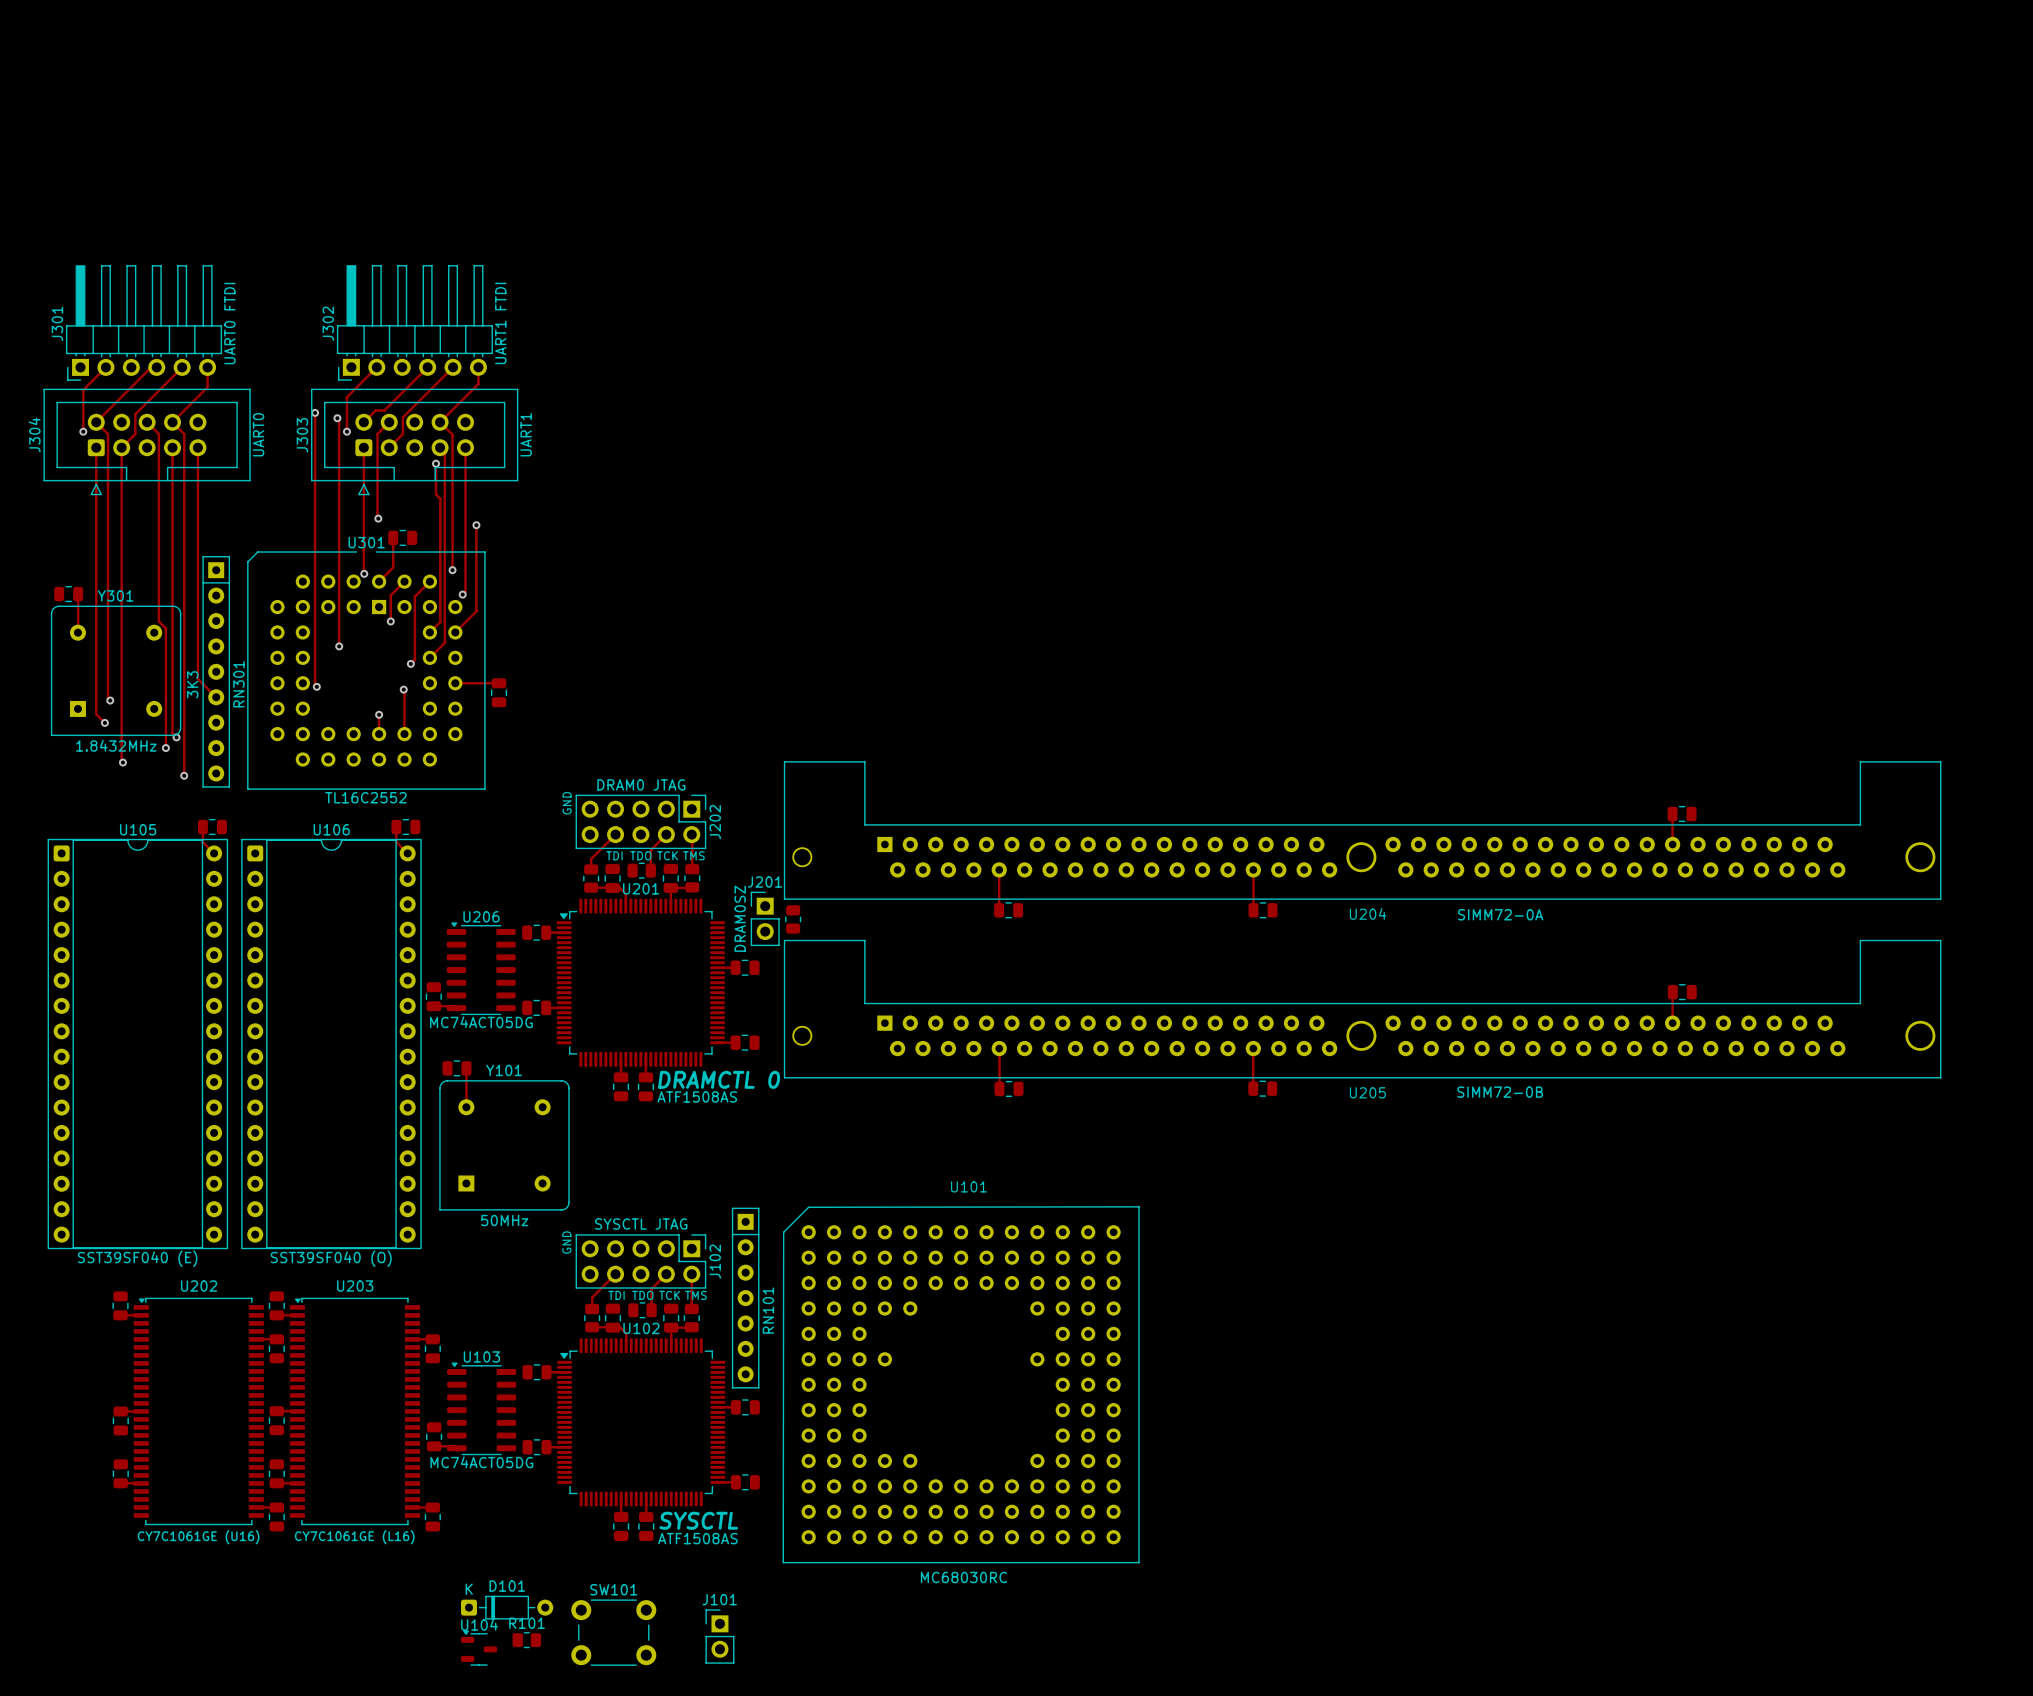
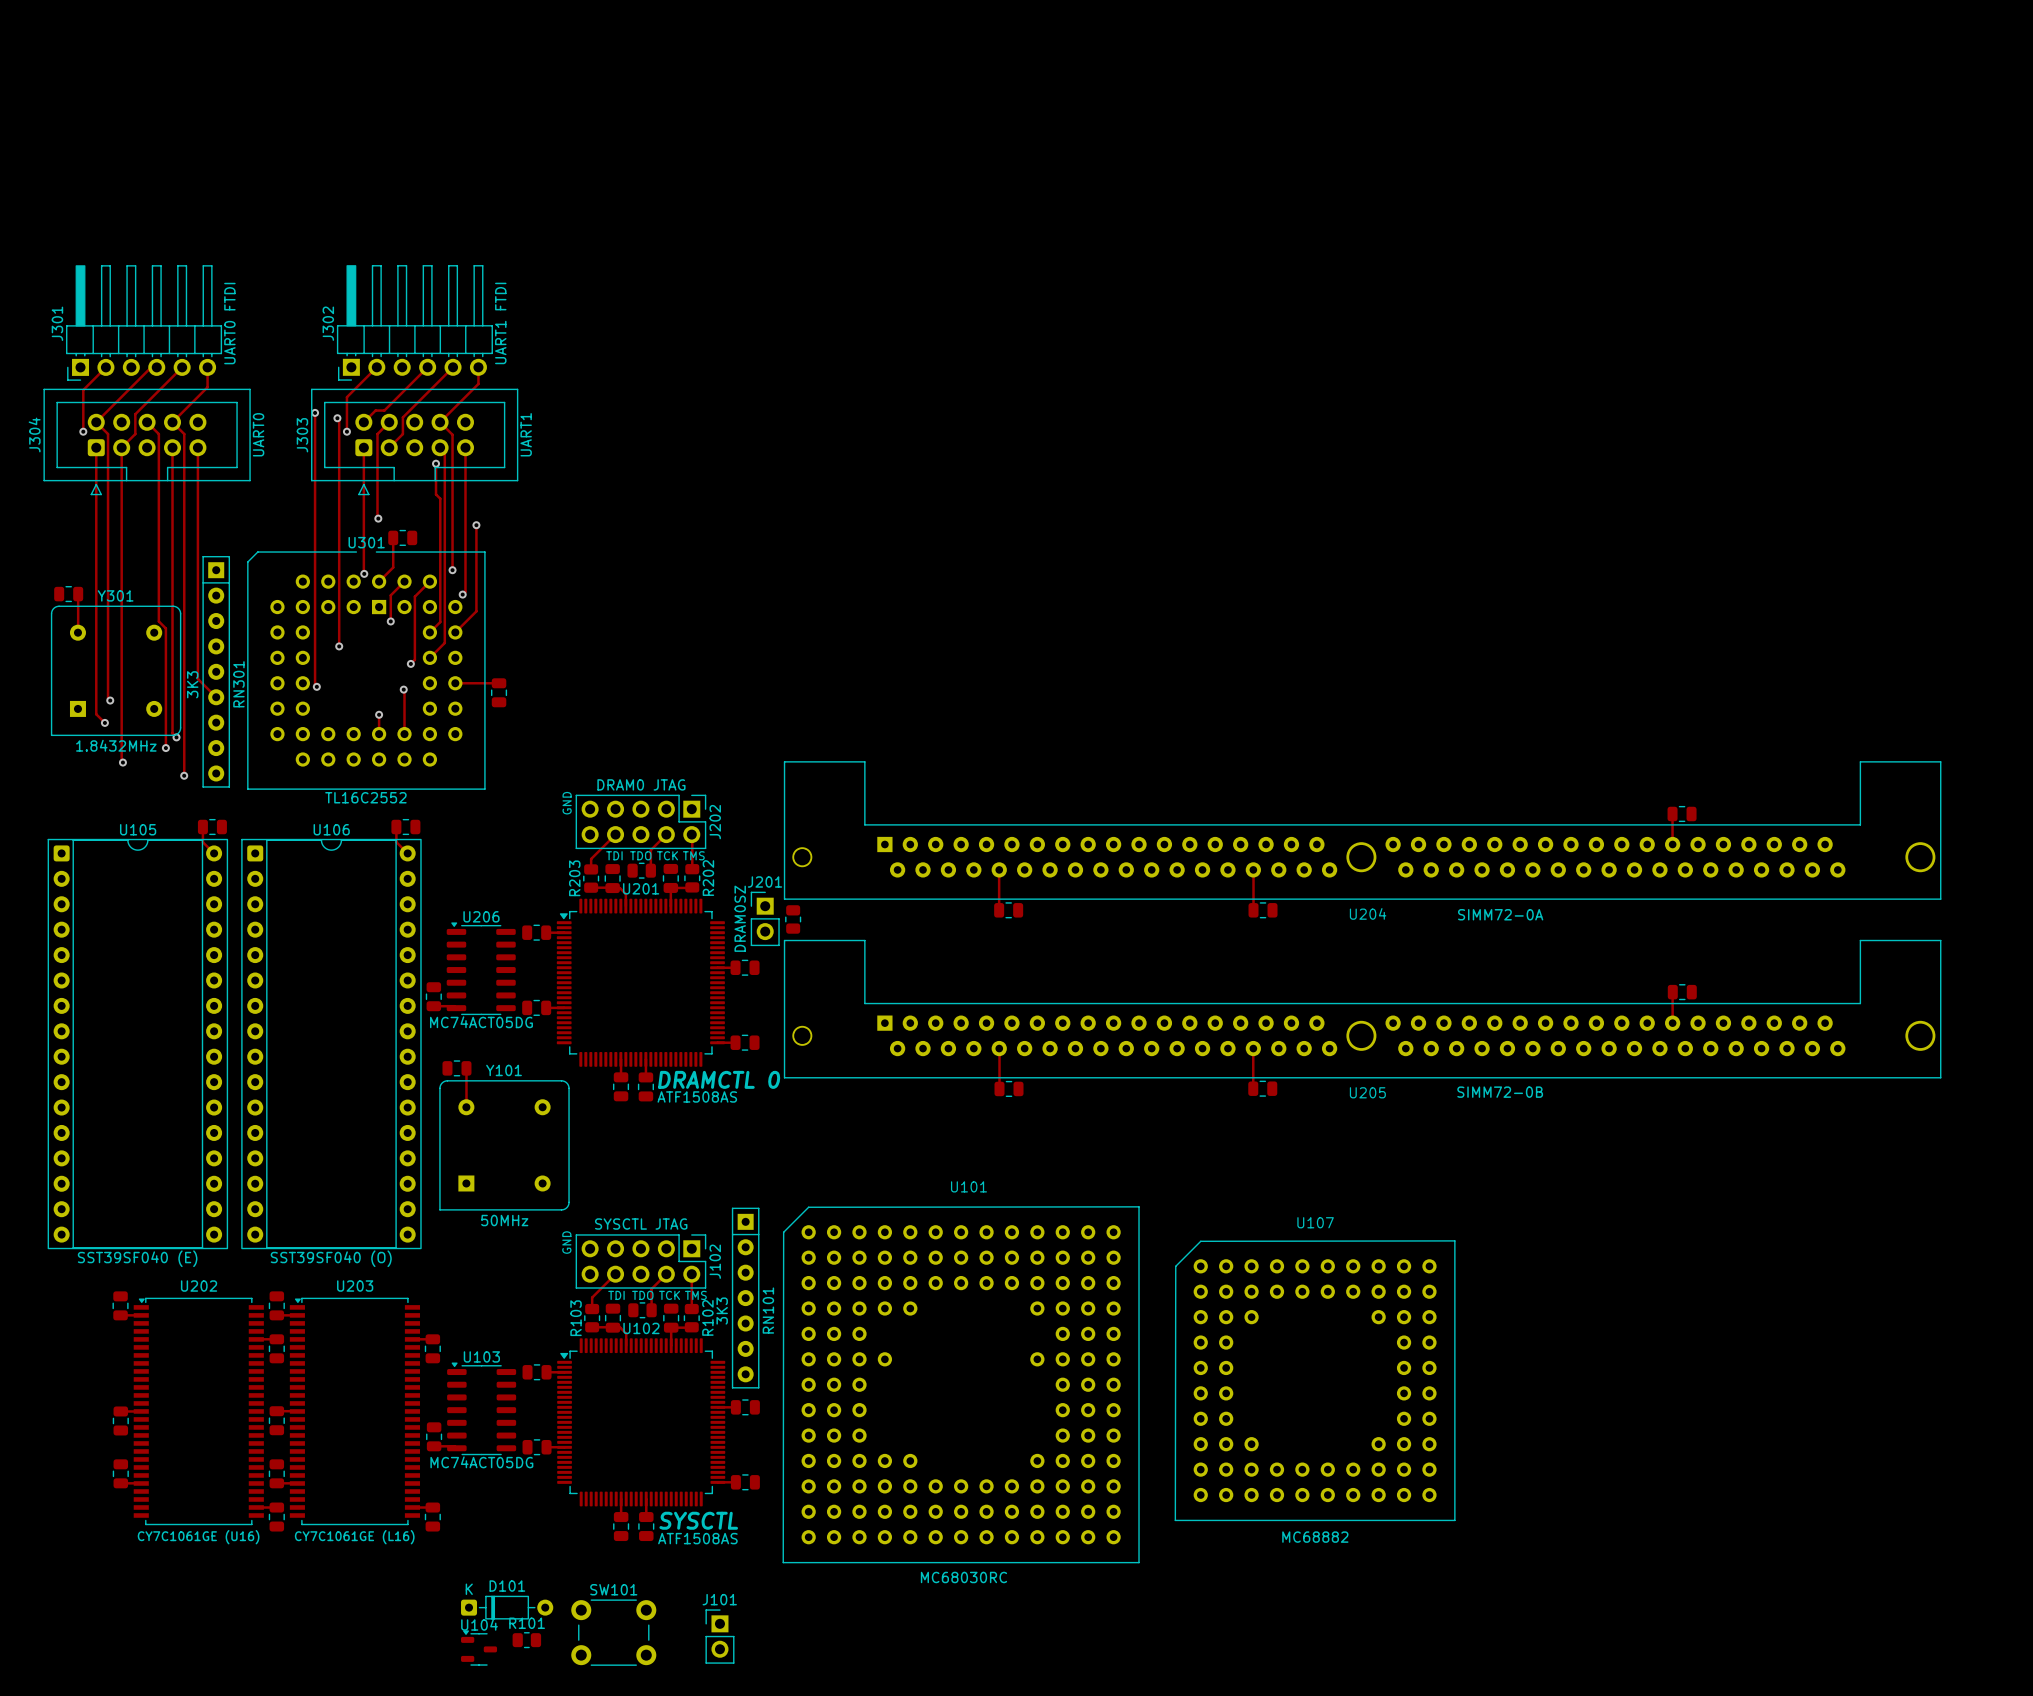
R203 name: none -> R203 (574, 878)
R202 name: none -> R202 (708, 878)
RN101 value: none -> 3K3 (722, 1311)
R102 name: none -> R102 (707, 1317)
R103 name: none -> R103 (576, 1318)
U107: none -> MC68882 (1315, 1380)

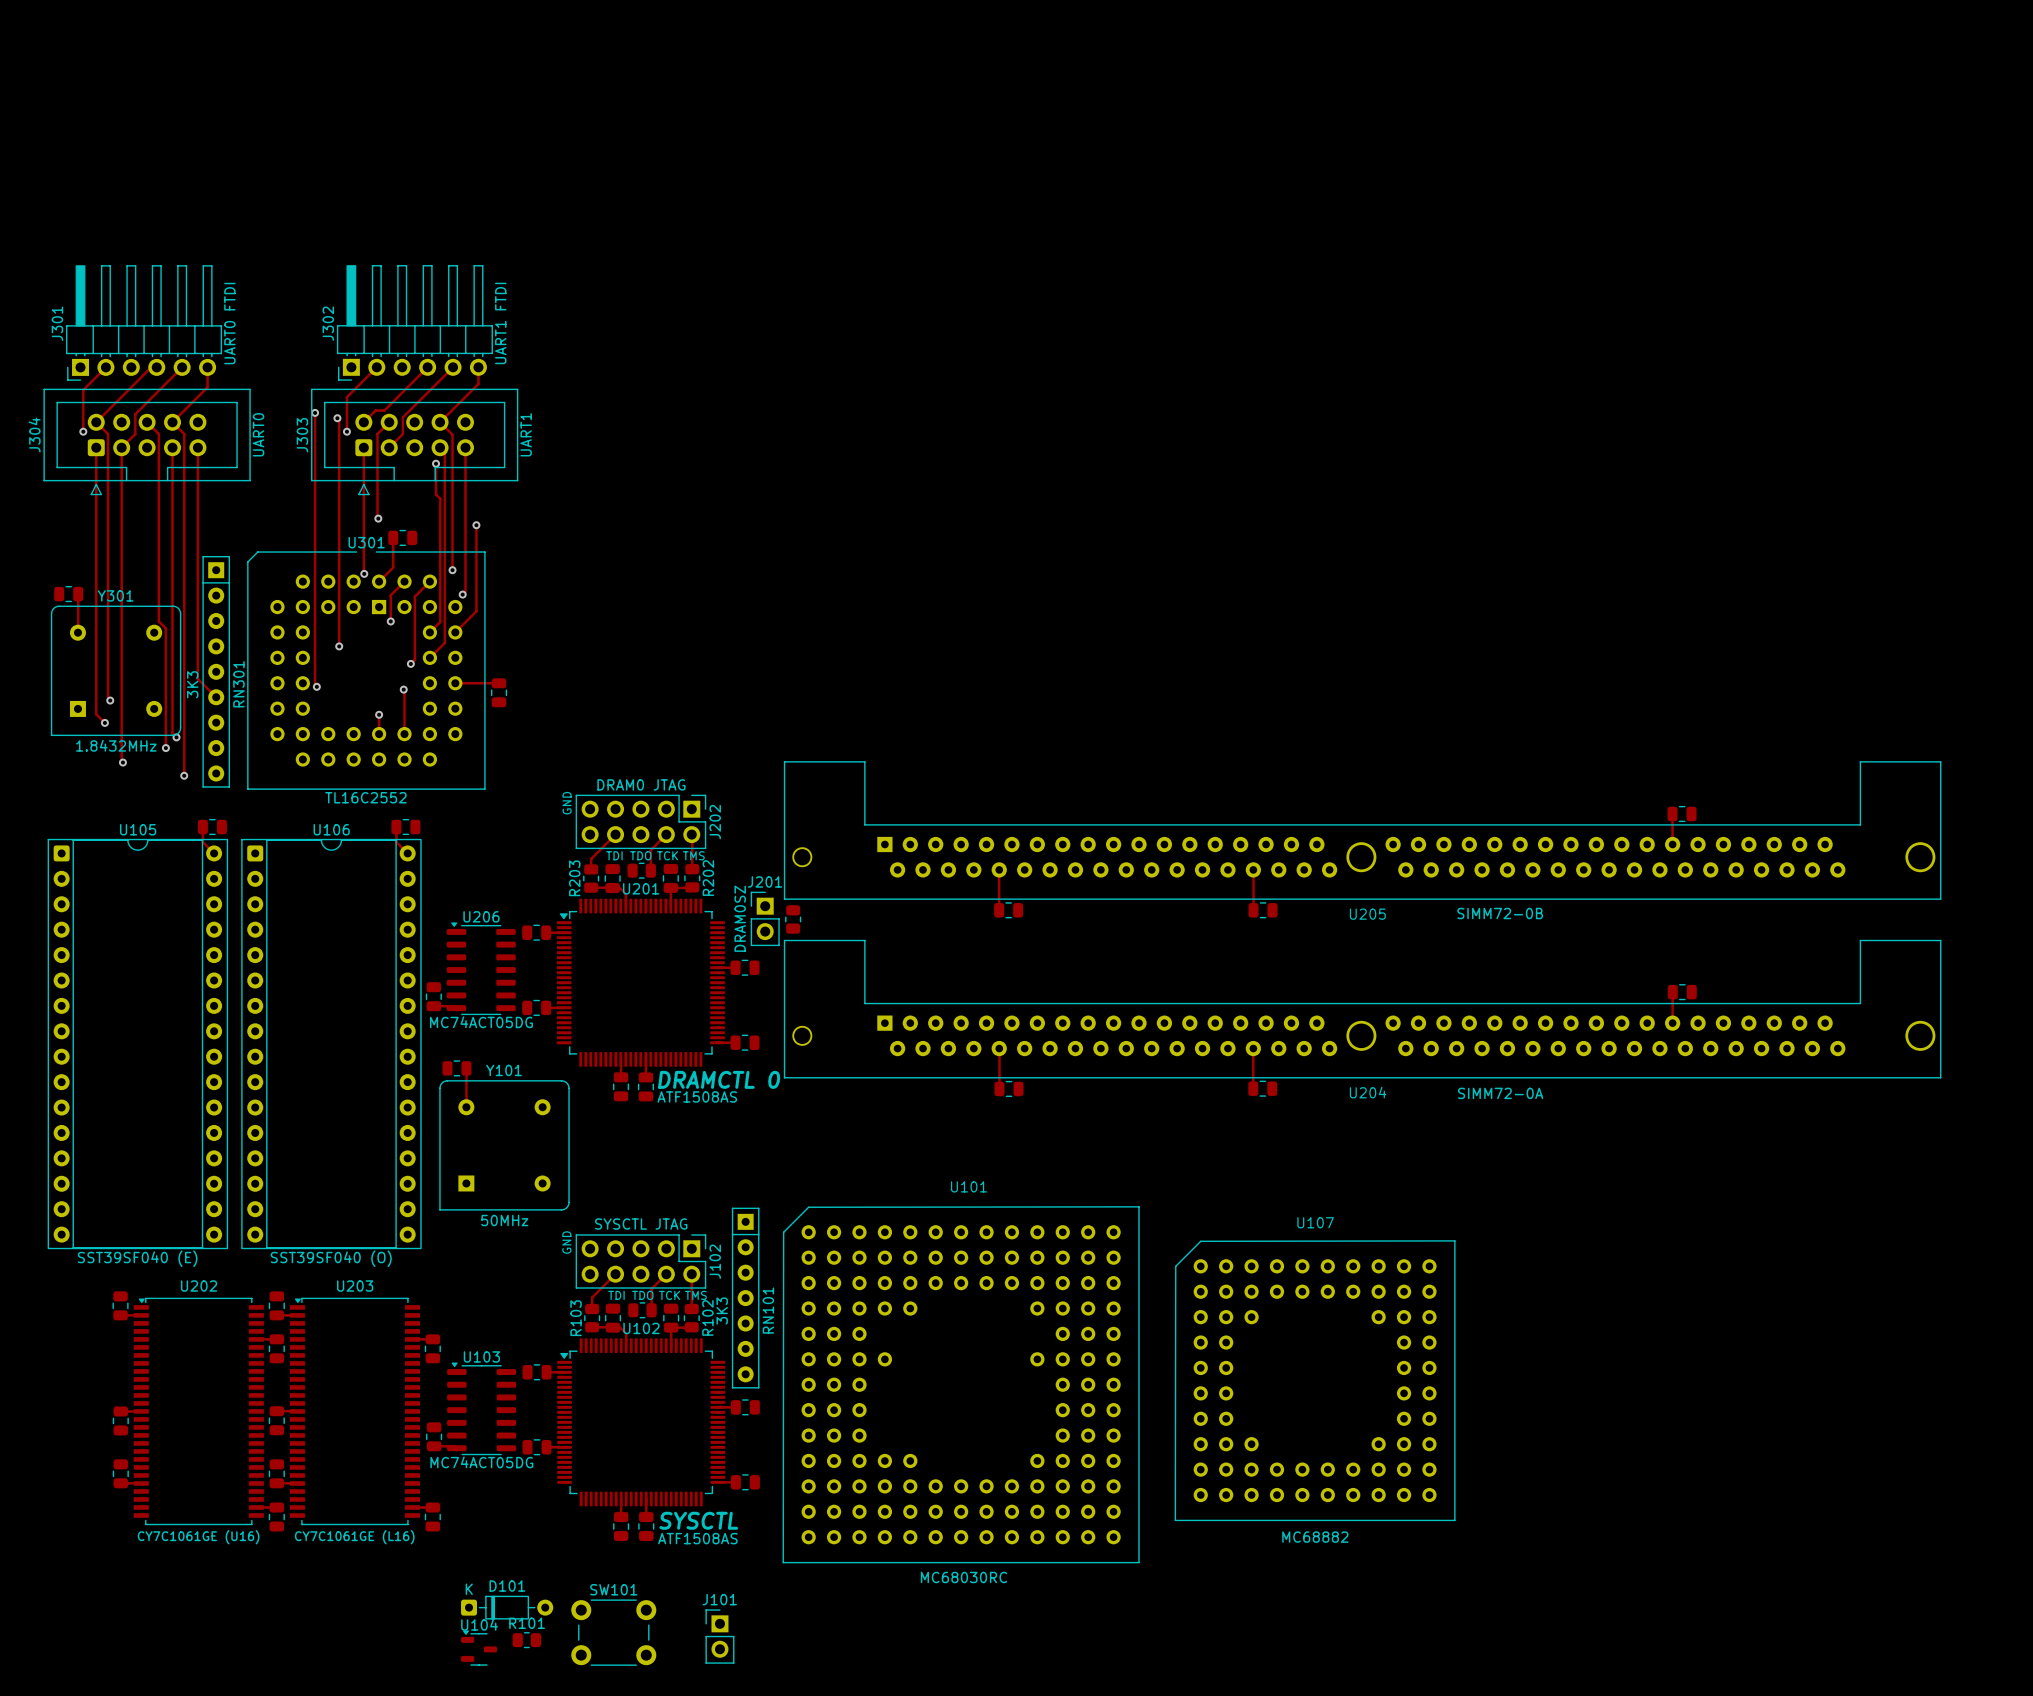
U204 name: U204 (1368, 913) -> U205 (1367, 914)
U204 value: SIMM72-0A (1500, 914) -> SIMM72-0B (1500, 913)
U205 name: U205 (1367, 1092) -> U204 (1368, 1092)
U205 value: SIMM72-0B (1500, 1092) -> SIMM72-0A (1500, 1093)

